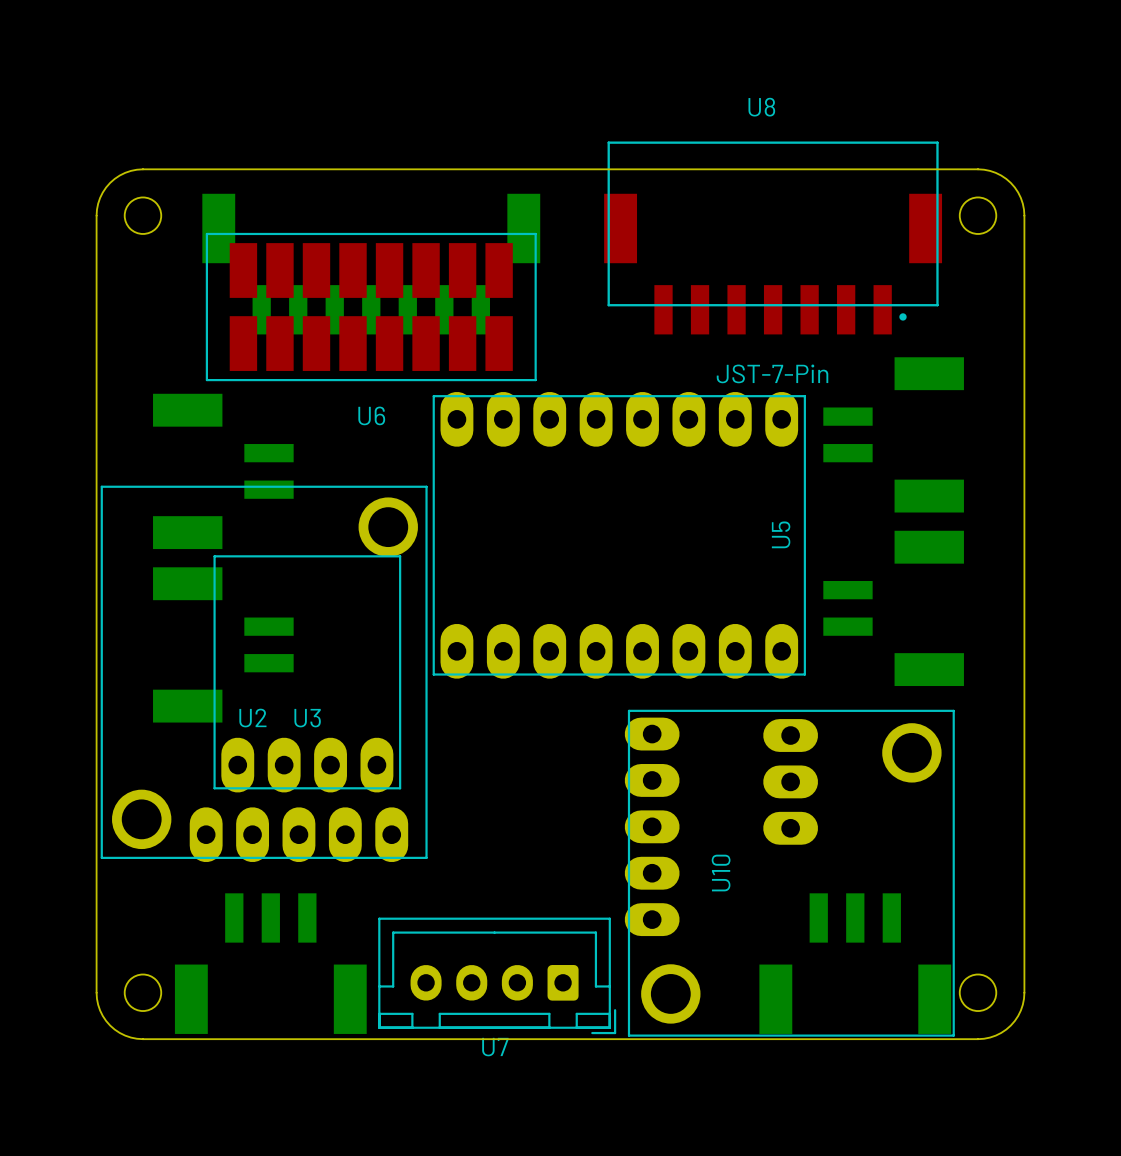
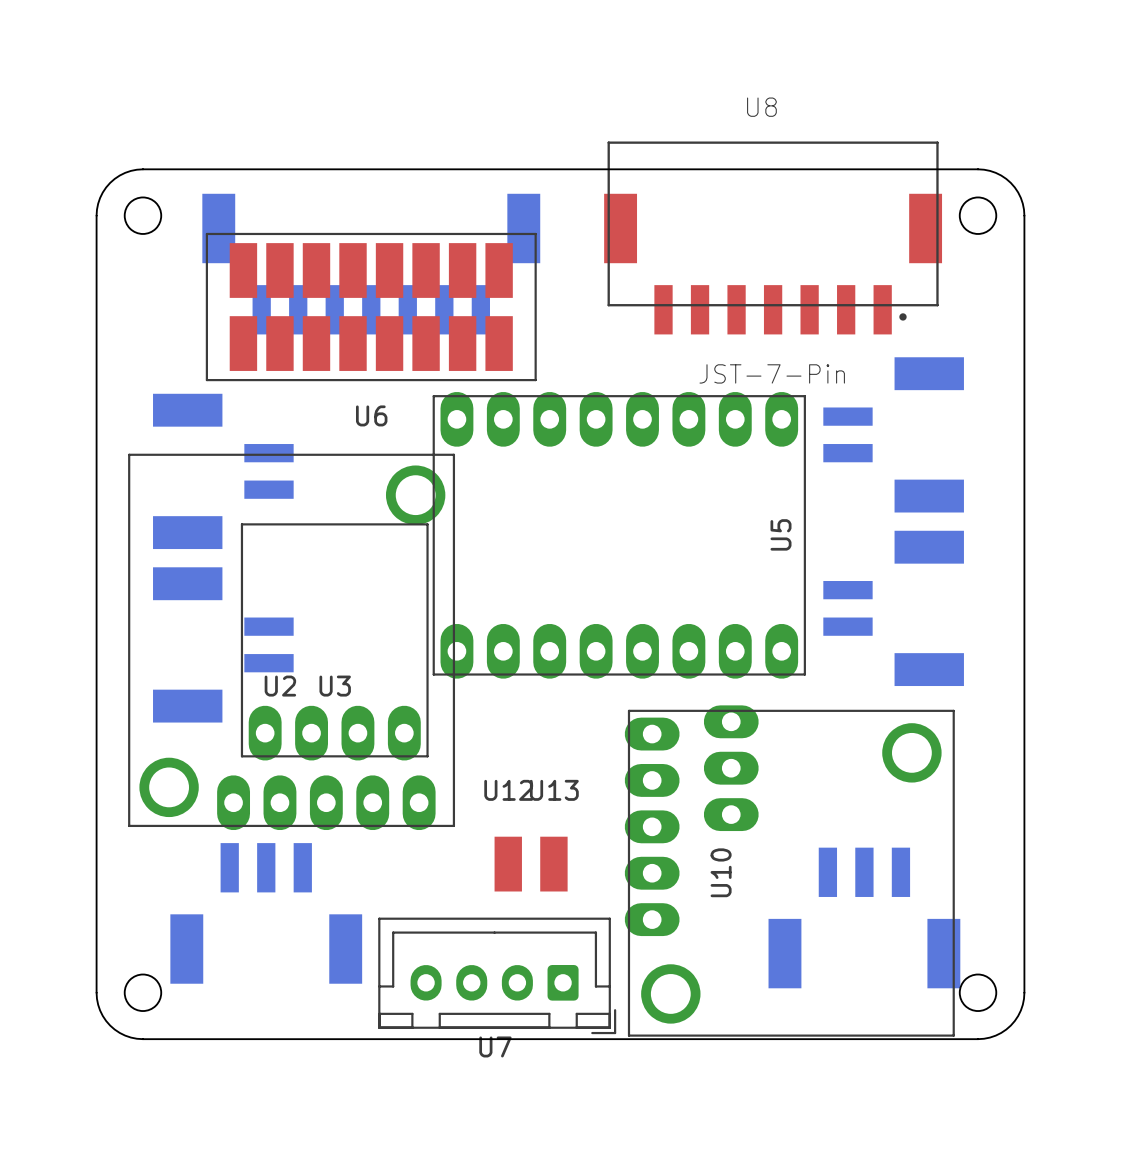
U2 position: (264, 673) -> (291, 641)
U3 position: (307, 673) -> (334, 641)
part position: (790, 781) -> (731, 768)
U12: none -> (508, 864)
U13: none -> (553, 864)
part position: (270, 963) -> (266, 913)
part position: (855, 963) -> (864, 917)

